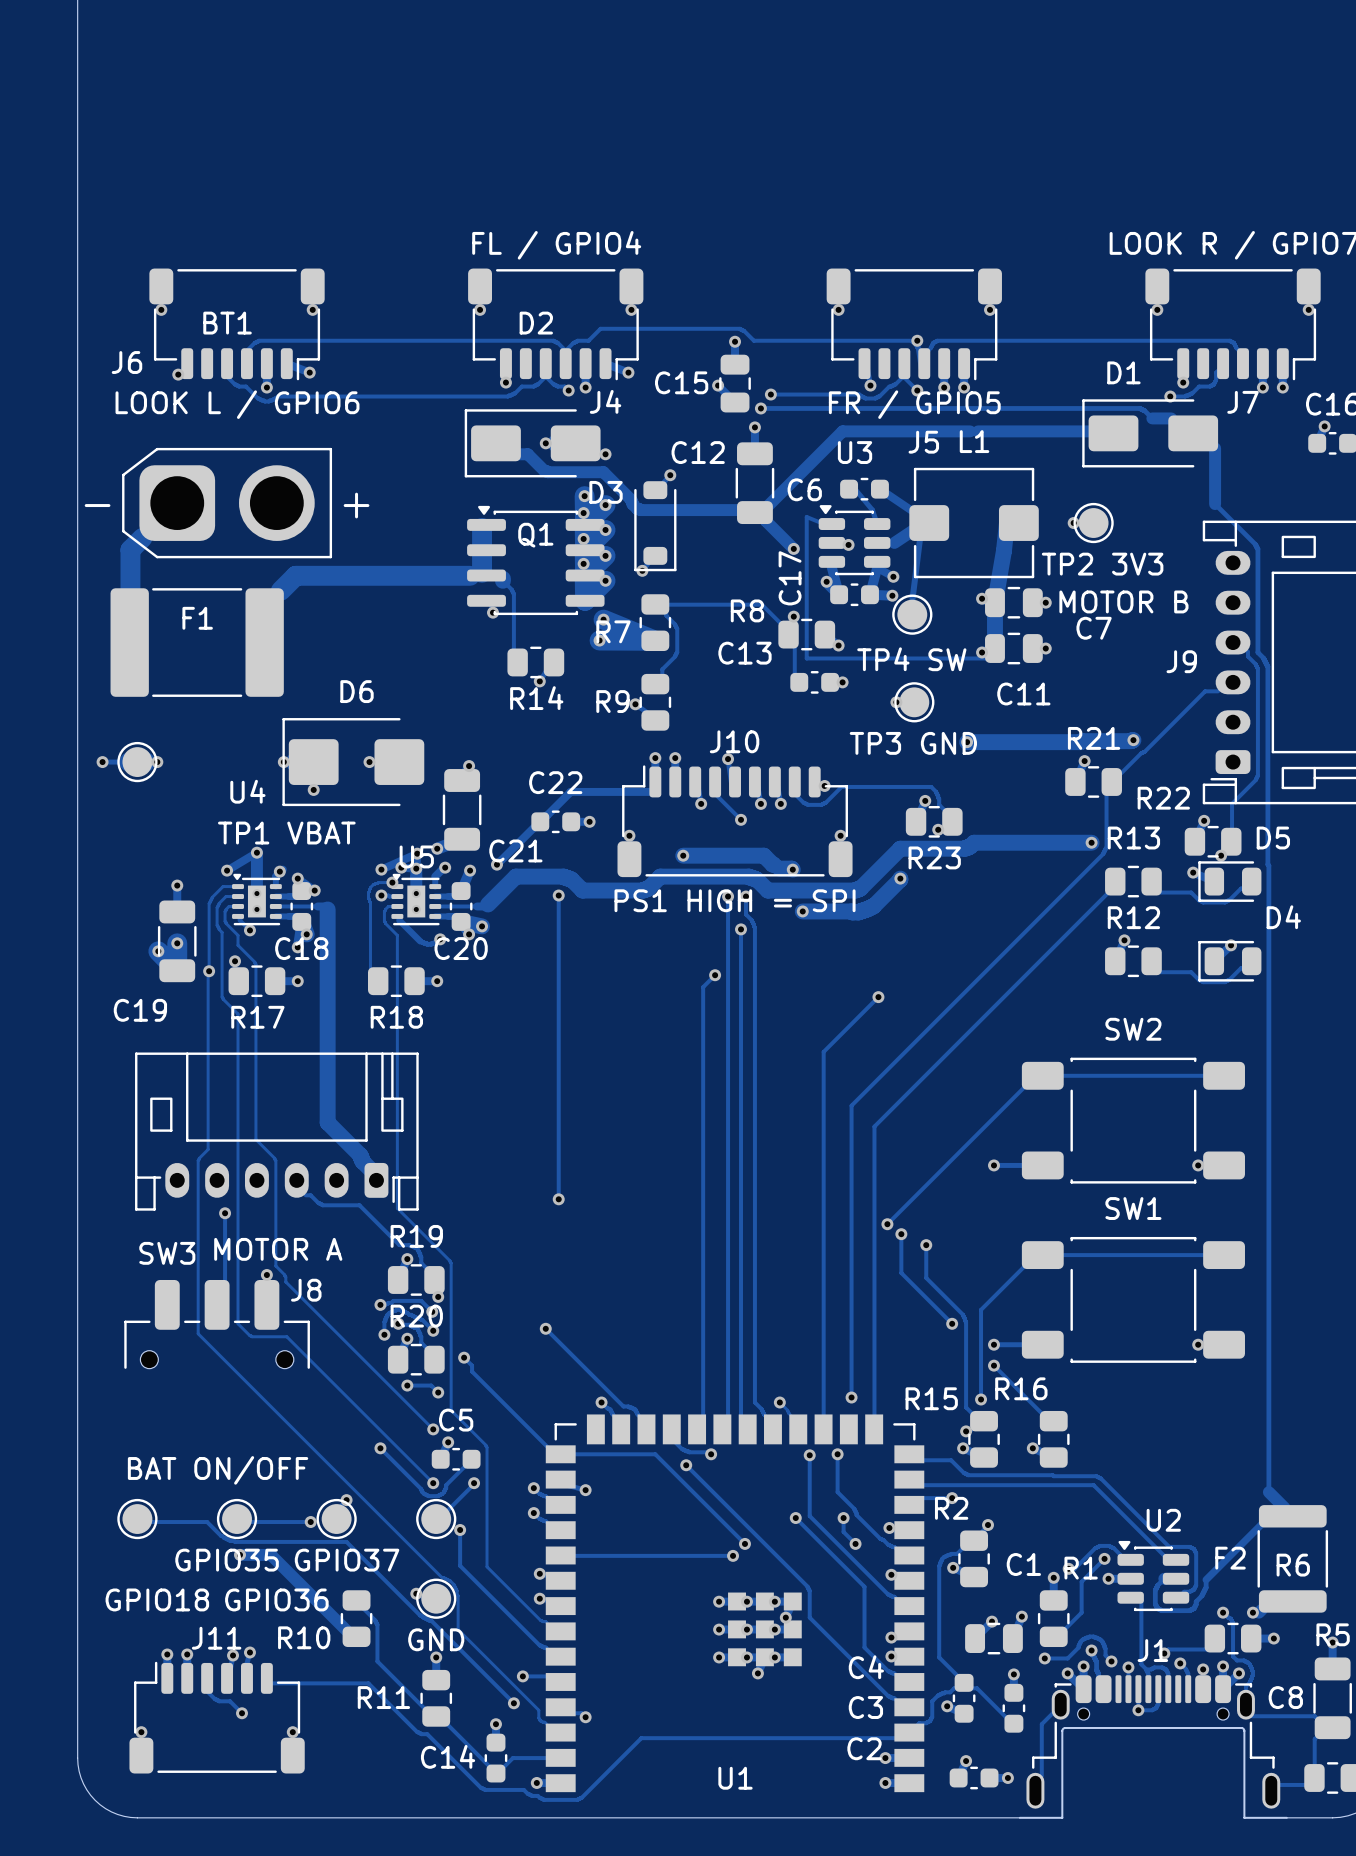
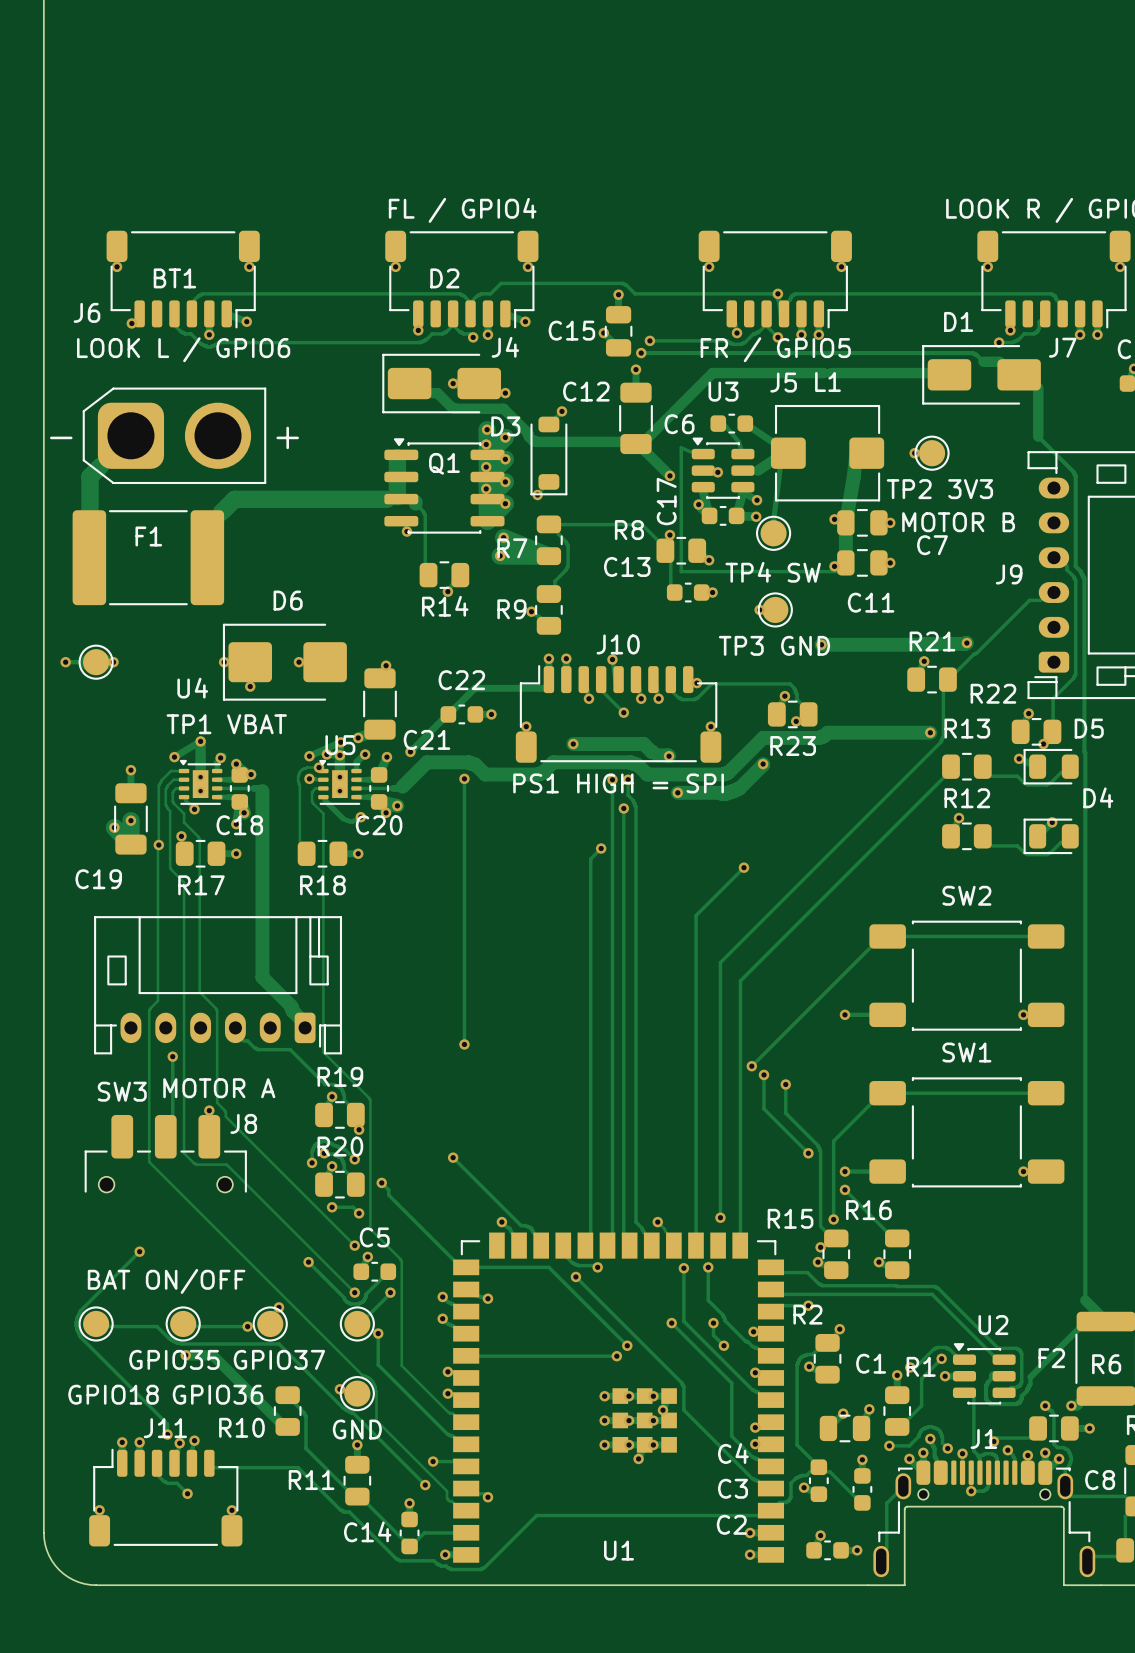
track: (380, 1304) (393, 1300) (421, 1300) (432, 1311) -> none
via: (380, 1304) -> none
via: (432, 1311) -> none
track: none -> (139, 1251) (80, 1310) (76, 1325) (80, 1337) (167, 1424) (167, 1434)
via: none -> (139, 1251)
via: none -> (167, 1434)

